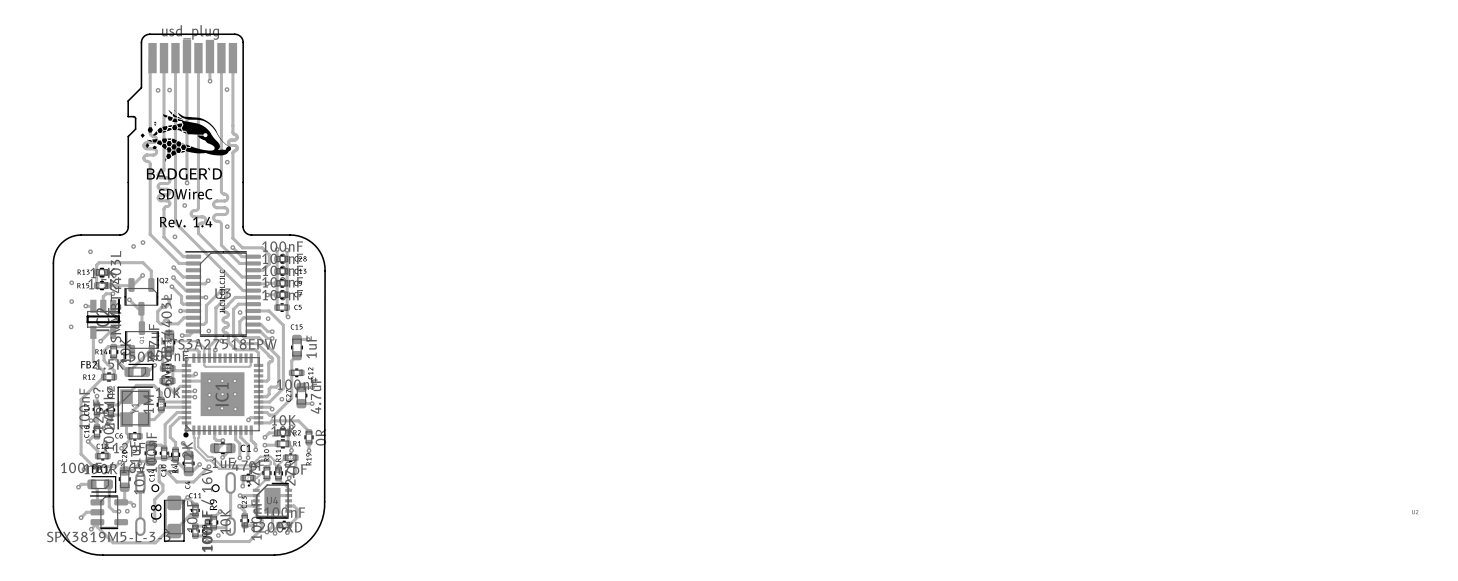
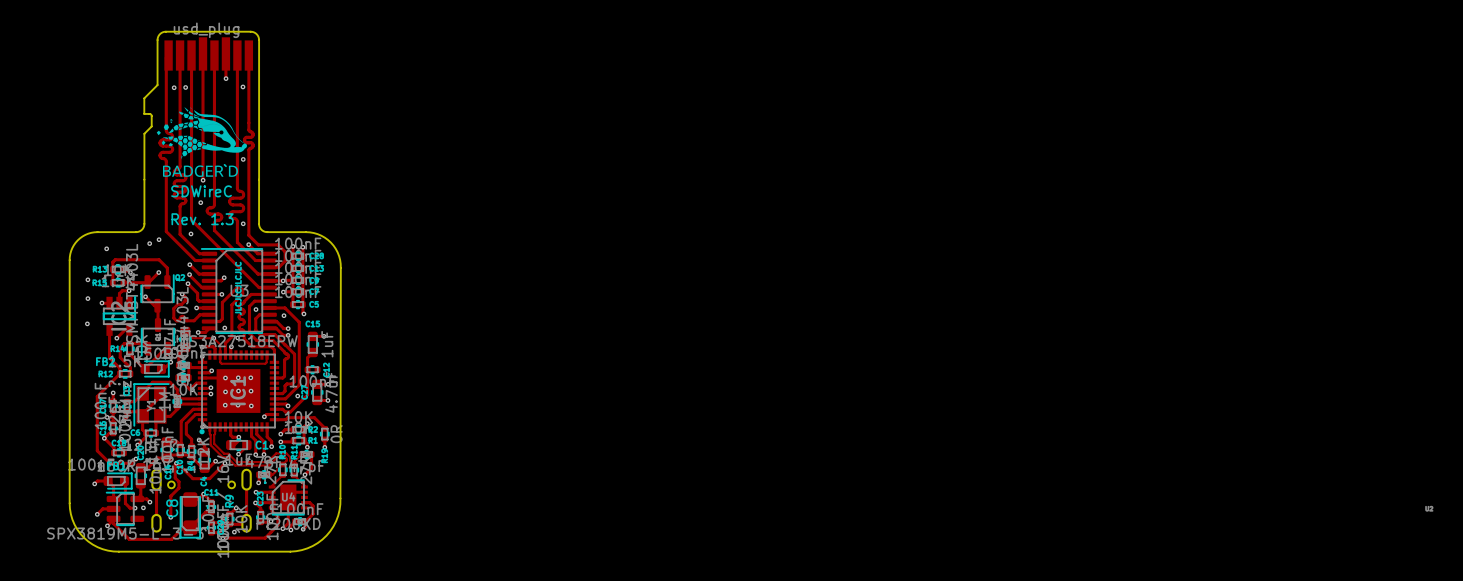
text: Rev. 1.4 (186, 222) -> Rev. 1.3 (202, 219)

